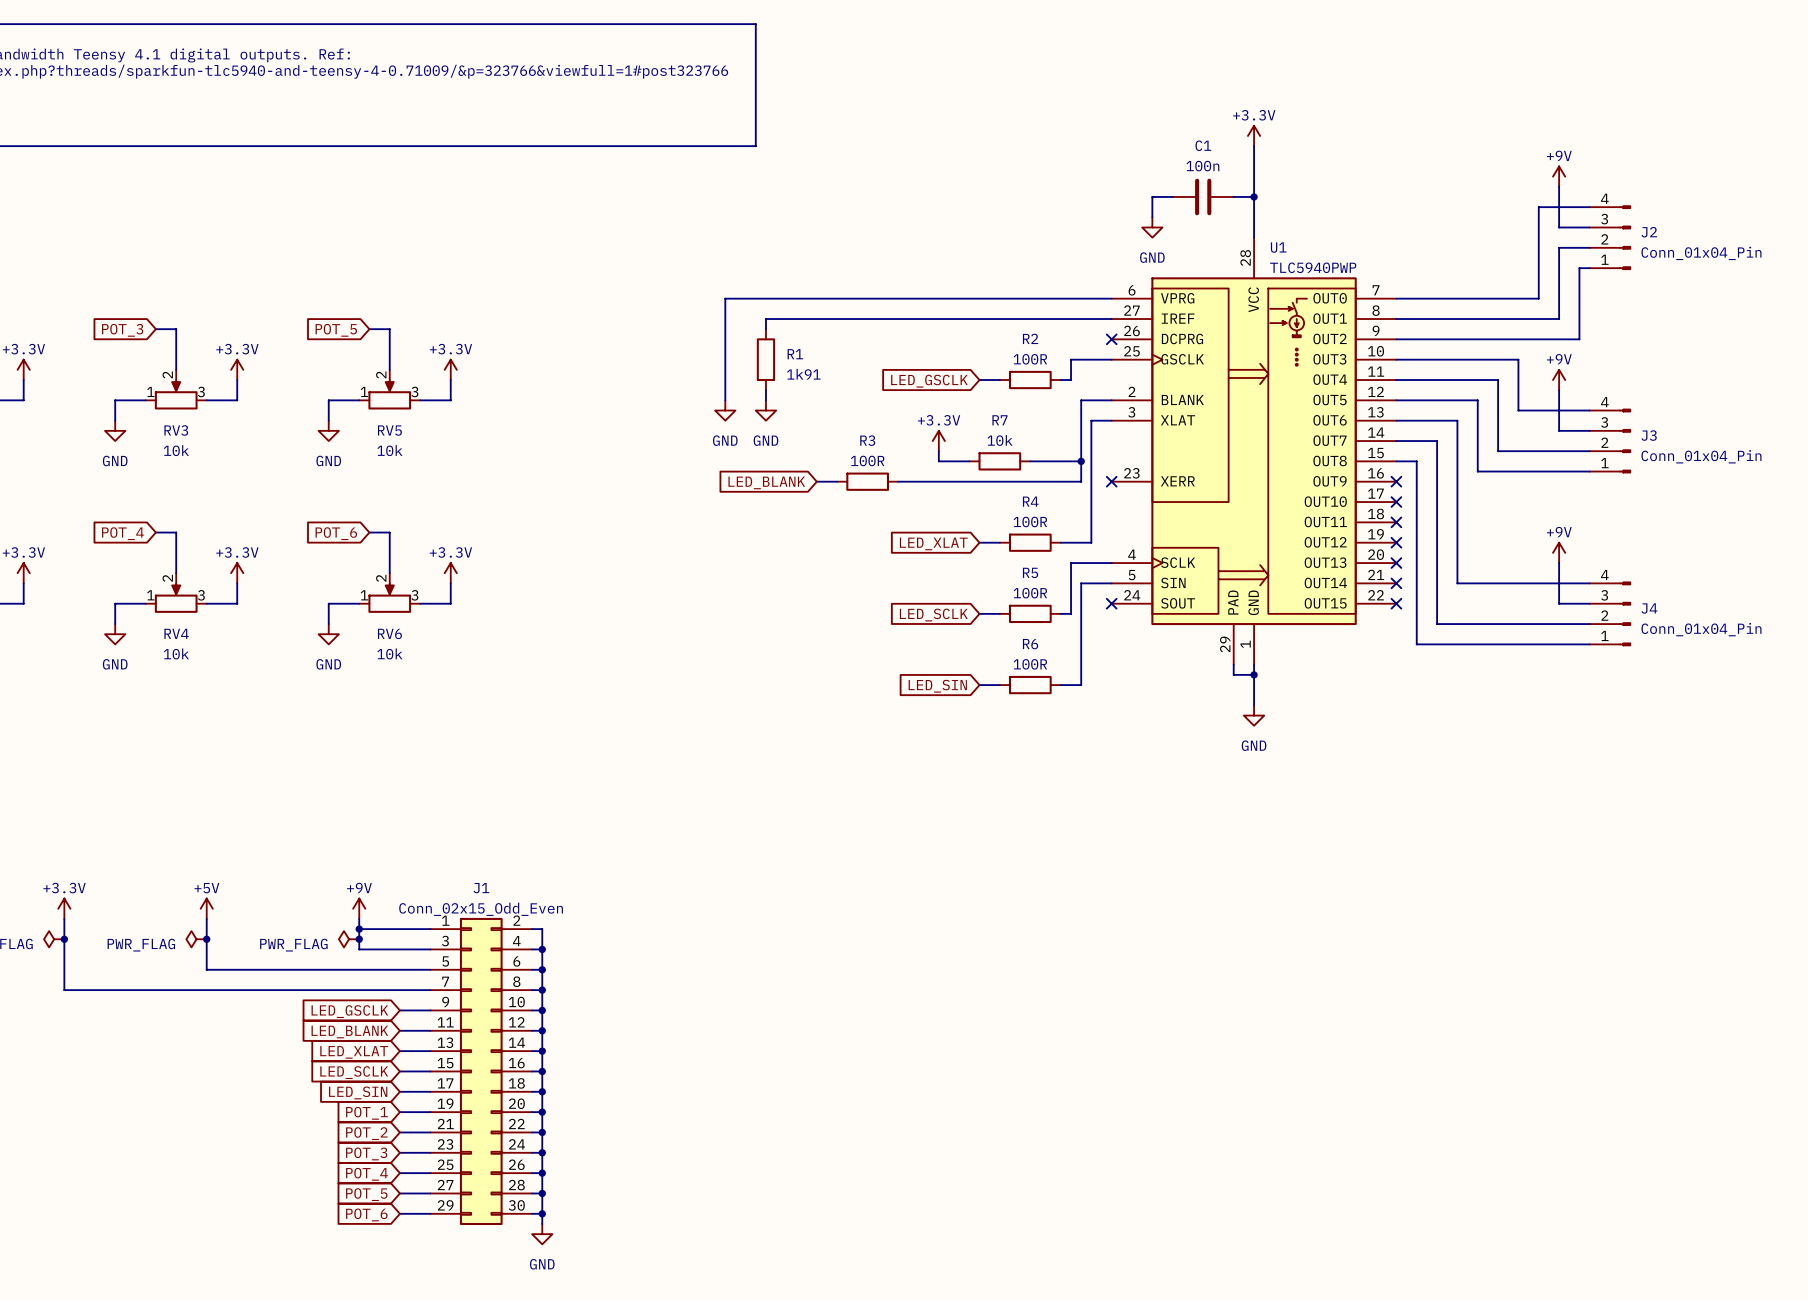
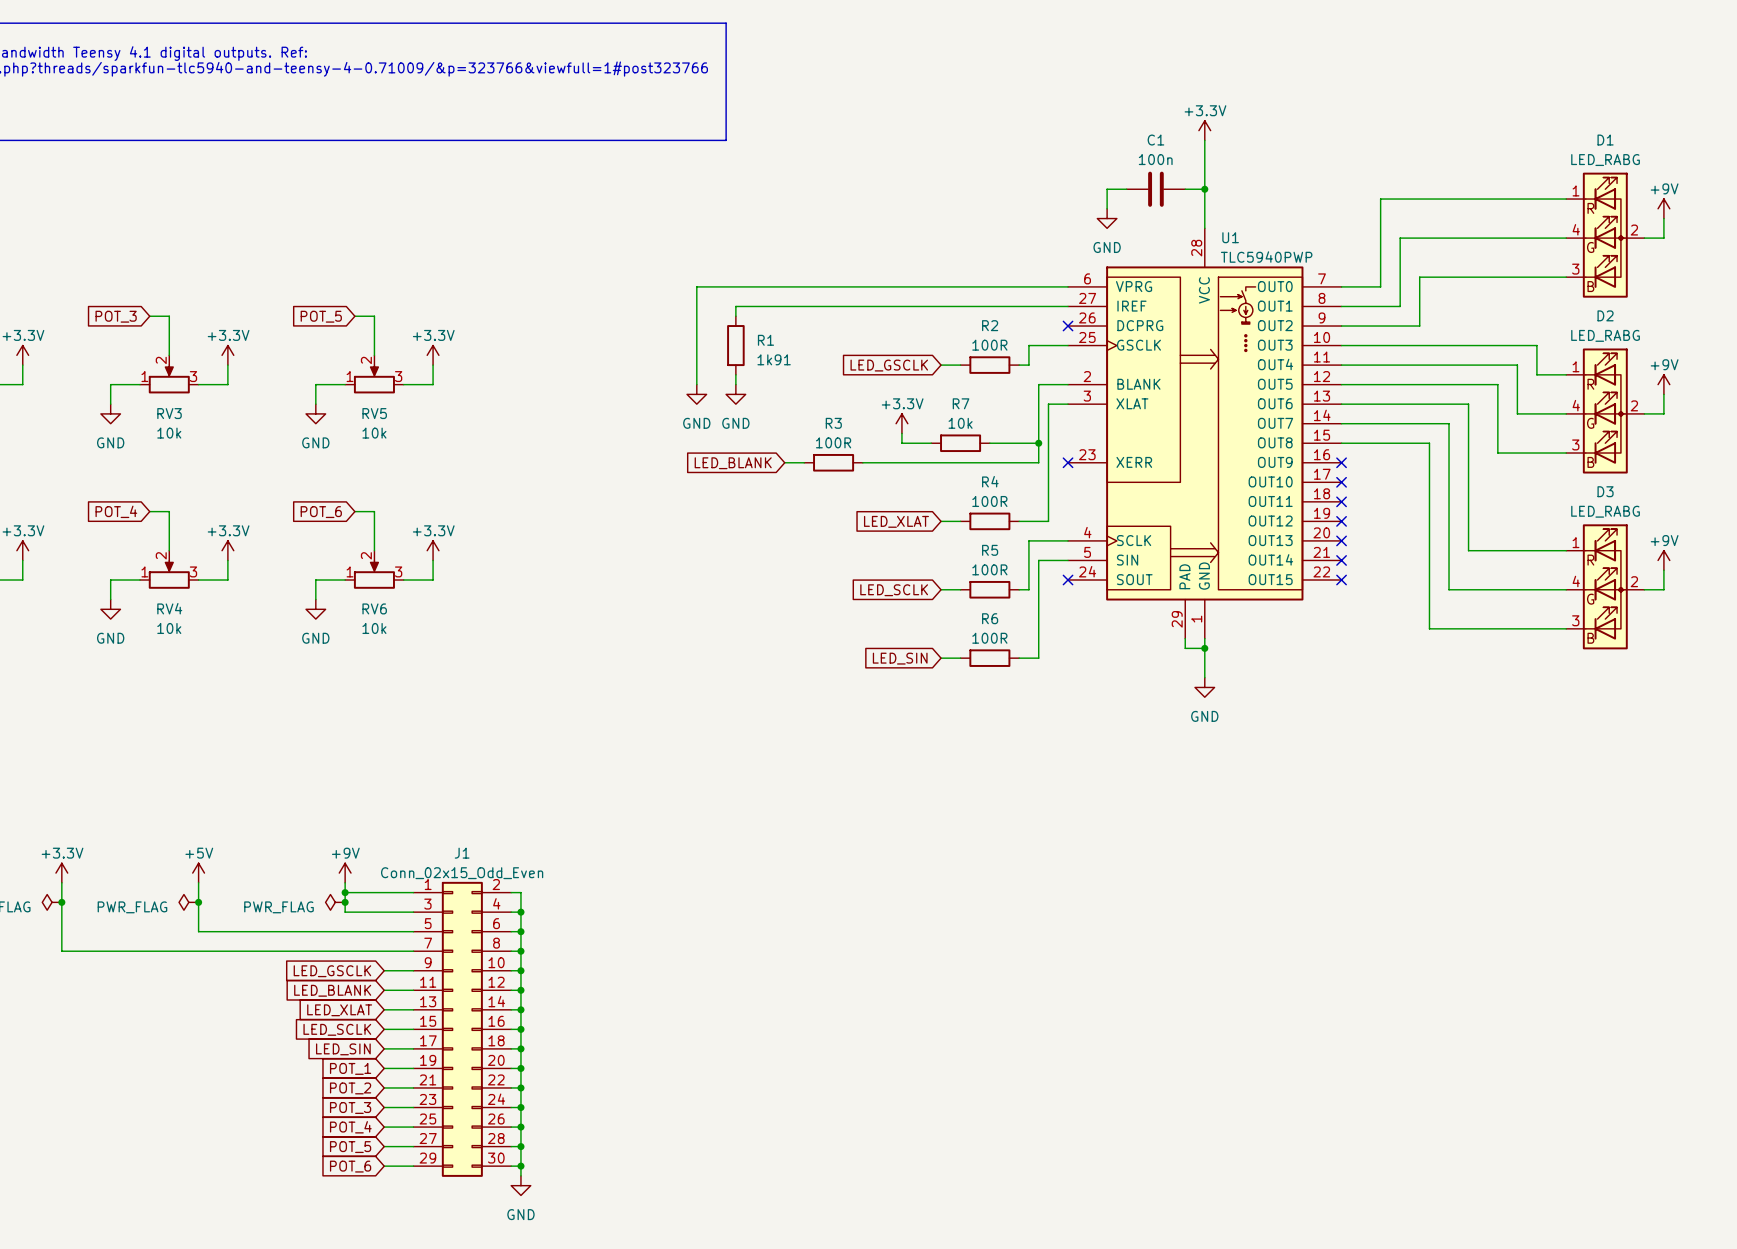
power symbol: +9V (1559, 176) -> none
wire: (1559, 186) (1559, 227) (1589, 227) -> none
wire: (1538, 207) (1538, 298) (1437, 298) -> (1478, 199) (1380, 199) (1380, 286)
power symbol: none -> +9V (1663, 208)
wire: none -> (1663, 218) (1663, 238) (1644, 238)
J2: Conn_01x04_Pin (1610, 237) -> none
D1: none -> LED_RABG (1605, 235)
wire: (1559, 247) (1559, 319) (1457, 319) -> (1497, 238) (1400, 238) (1400, 306)
wire: (1589, 268) (1579, 268) (1579, 339) (1477, 339) -> (1566, 277) (1419, 277) (1419, 326)
wire: (1518, 359) (1518, 410) (1589, 410) -> (1458, 345) (1536, 345) (1536, 374) (1566, 374)
wire: (1498, 380) (1498, 451) (1589, 451) -> (1439, 365) (1517, 365) (1517, 413)
power symbol: +9V (1559, 380) -> none
wire: (1559, 390) (1559, 400) -> none
wire: (1477, 400) (1477, 471) (1559, 471) -> (1419, 384) (1497, 384)
power symbol: none -> +9V (1663, 384)
wire: none -> (1663, 394) (1663, 413) (1644, 413)
wire: (1457, 420) (1457, 583) (1589, 583) -> (1400, 404) (1468, 404) (1468, 550) (1566, 550)
D2: none -> LED_RABG (1605, 411)
wire: (1559, 430) (1579, 430) -> (1497, 413) (1497, 453)
wire: (1437, 441) (1437, 624) (1589, 624) -> (1380, 423) (1449, 423) (1449, 589) (1566, 589)
J3: Conn_01x04_Pin (1610, 441) -> none
wire: (1416, 461) (1416, 644) (1589, 644) -> (1361, 443) (1429, 443) (1429, 628) (1566, 628)
power symbol: +9V (1559, 552) -> none
wire: (1559, 563) (1559, 603) (1589, 603) -> none
power symbol: none -> +9V (1663, 560)
wire: none -> (1663, 570) (1663, 589) (1644, 589)
D3: none -> LED_RABG (1605, 586)
J4: Conn_01x04_Pin (1610, 613) -> none

